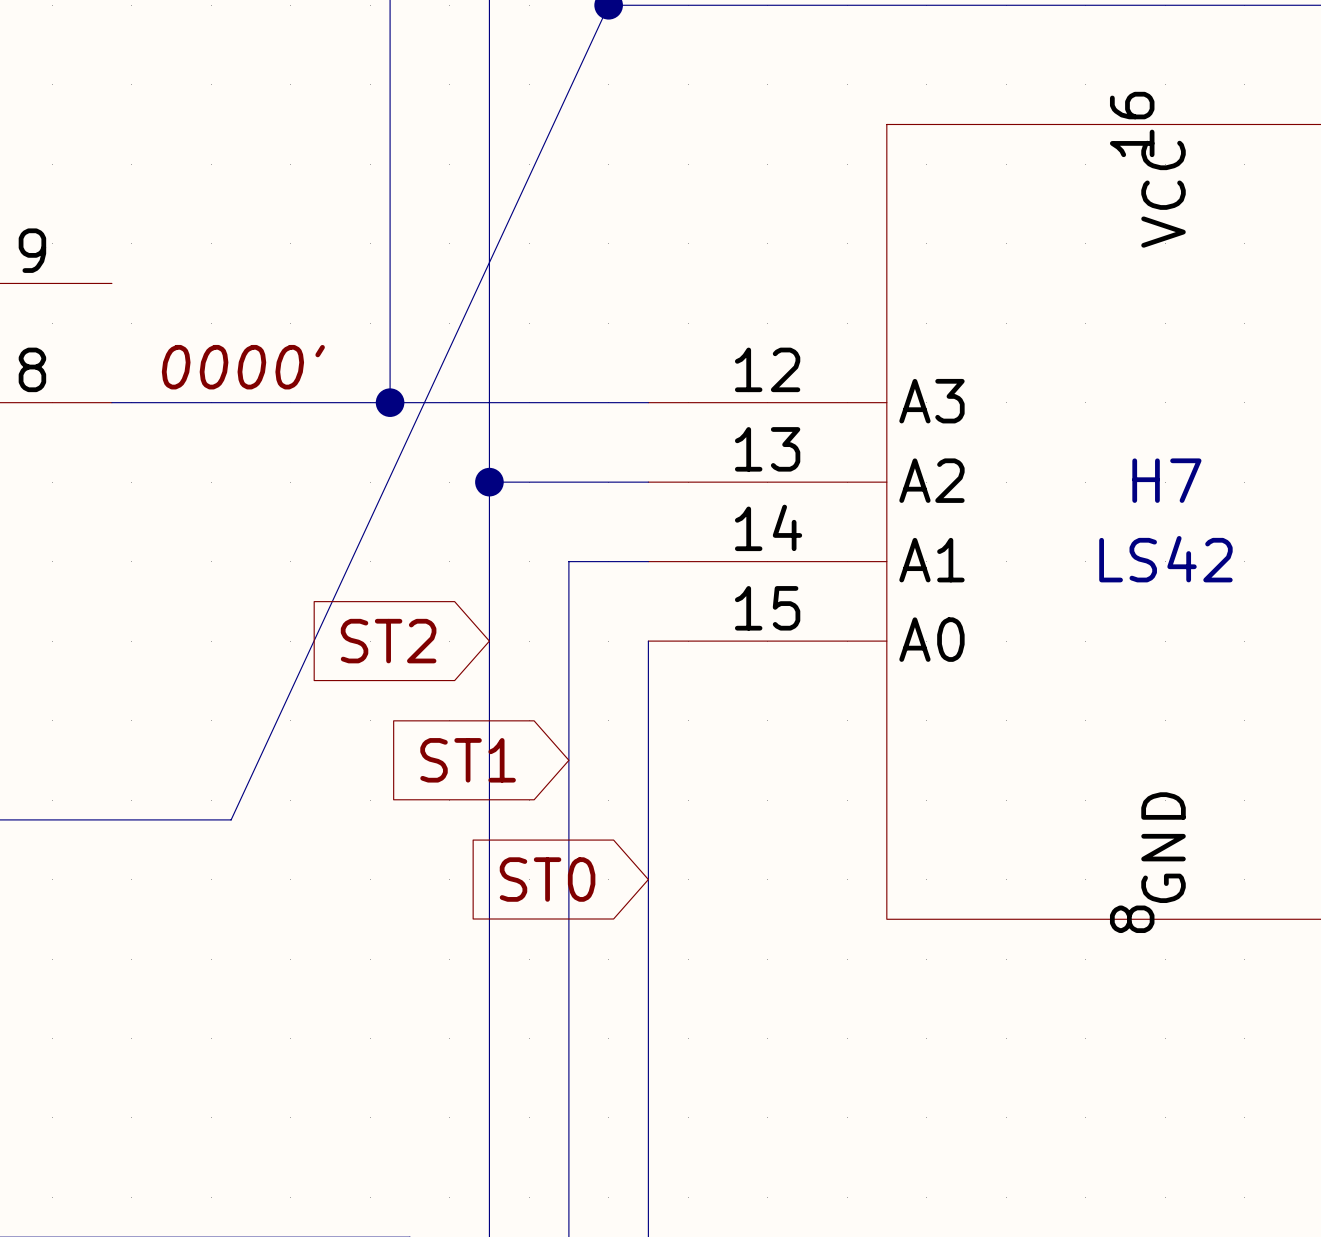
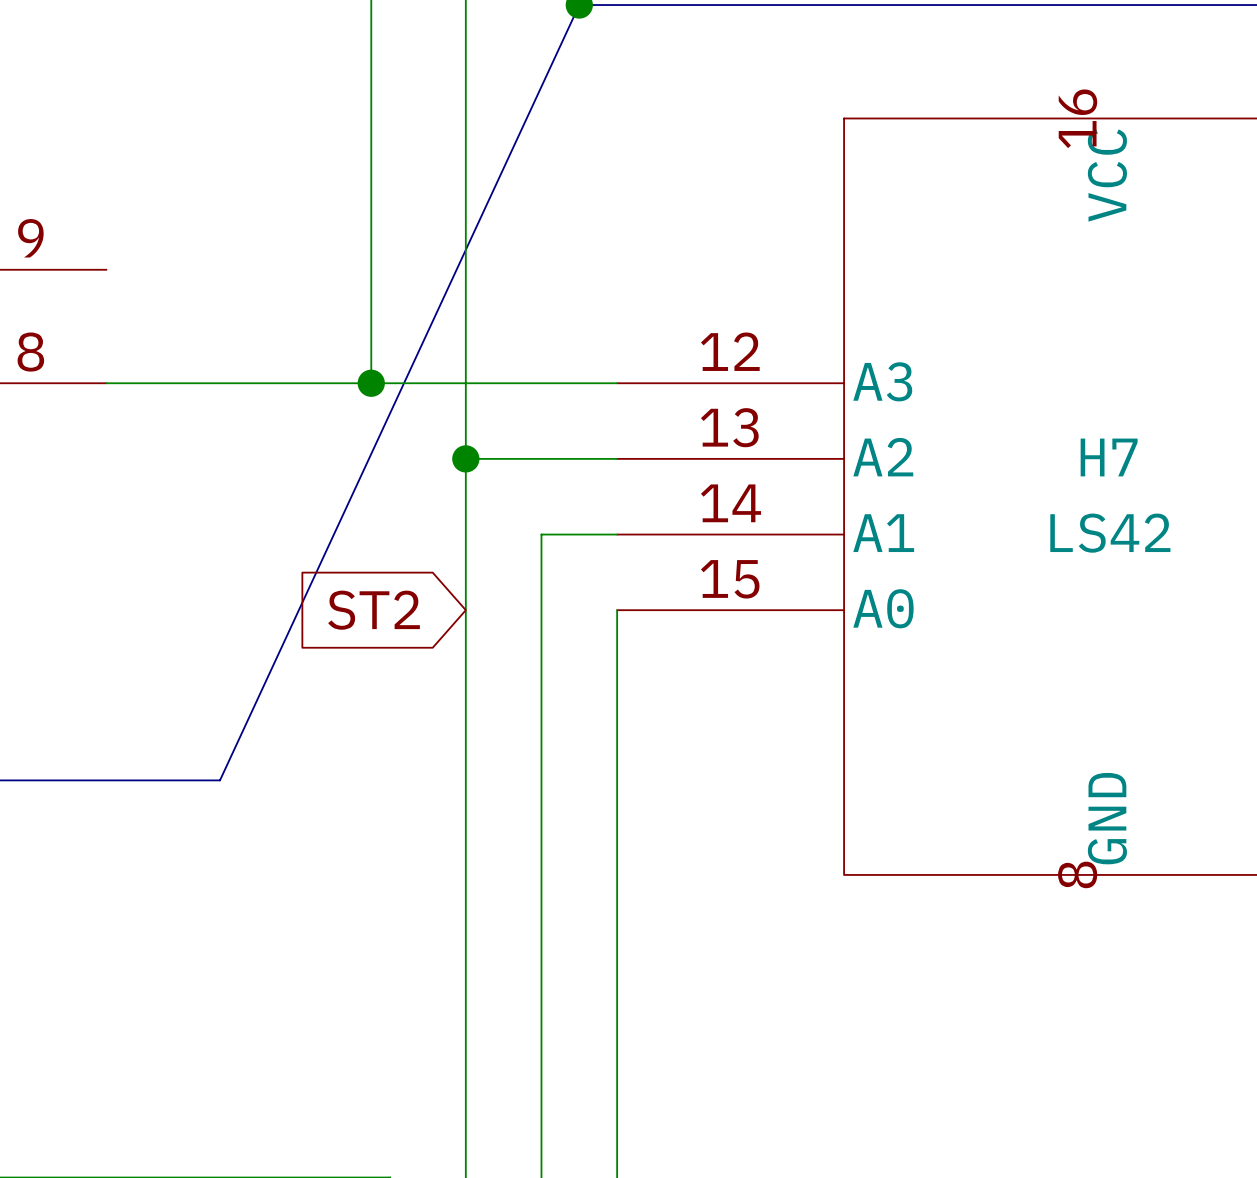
label: 0000' (243, 367) -> none
global label: ST1 (468, 760) -> none
global label: ST0 (547, 879) -> none

